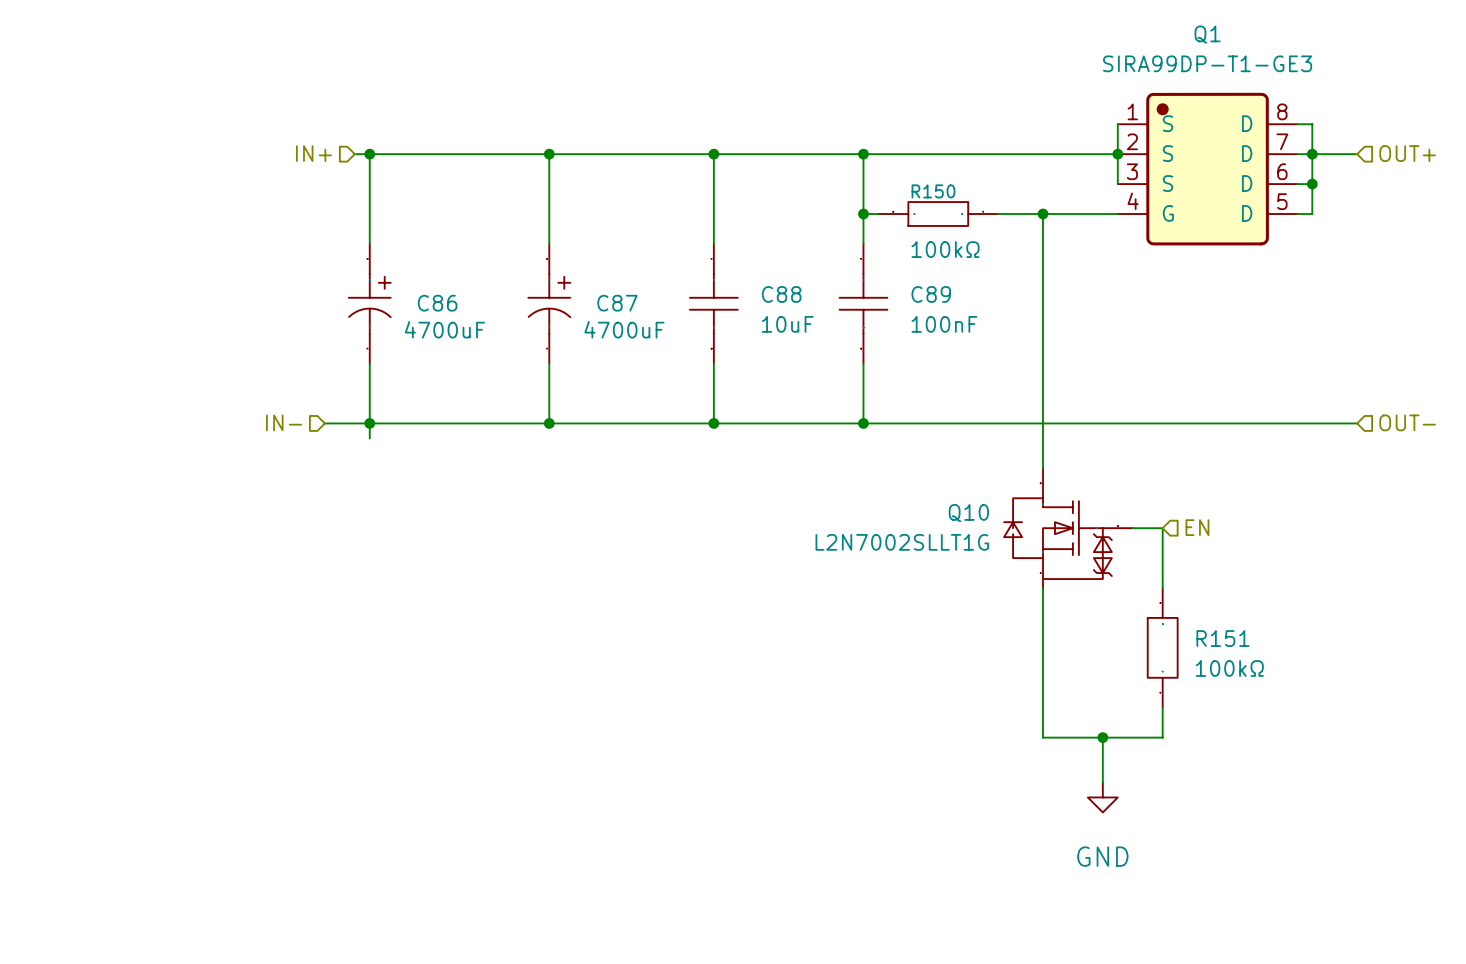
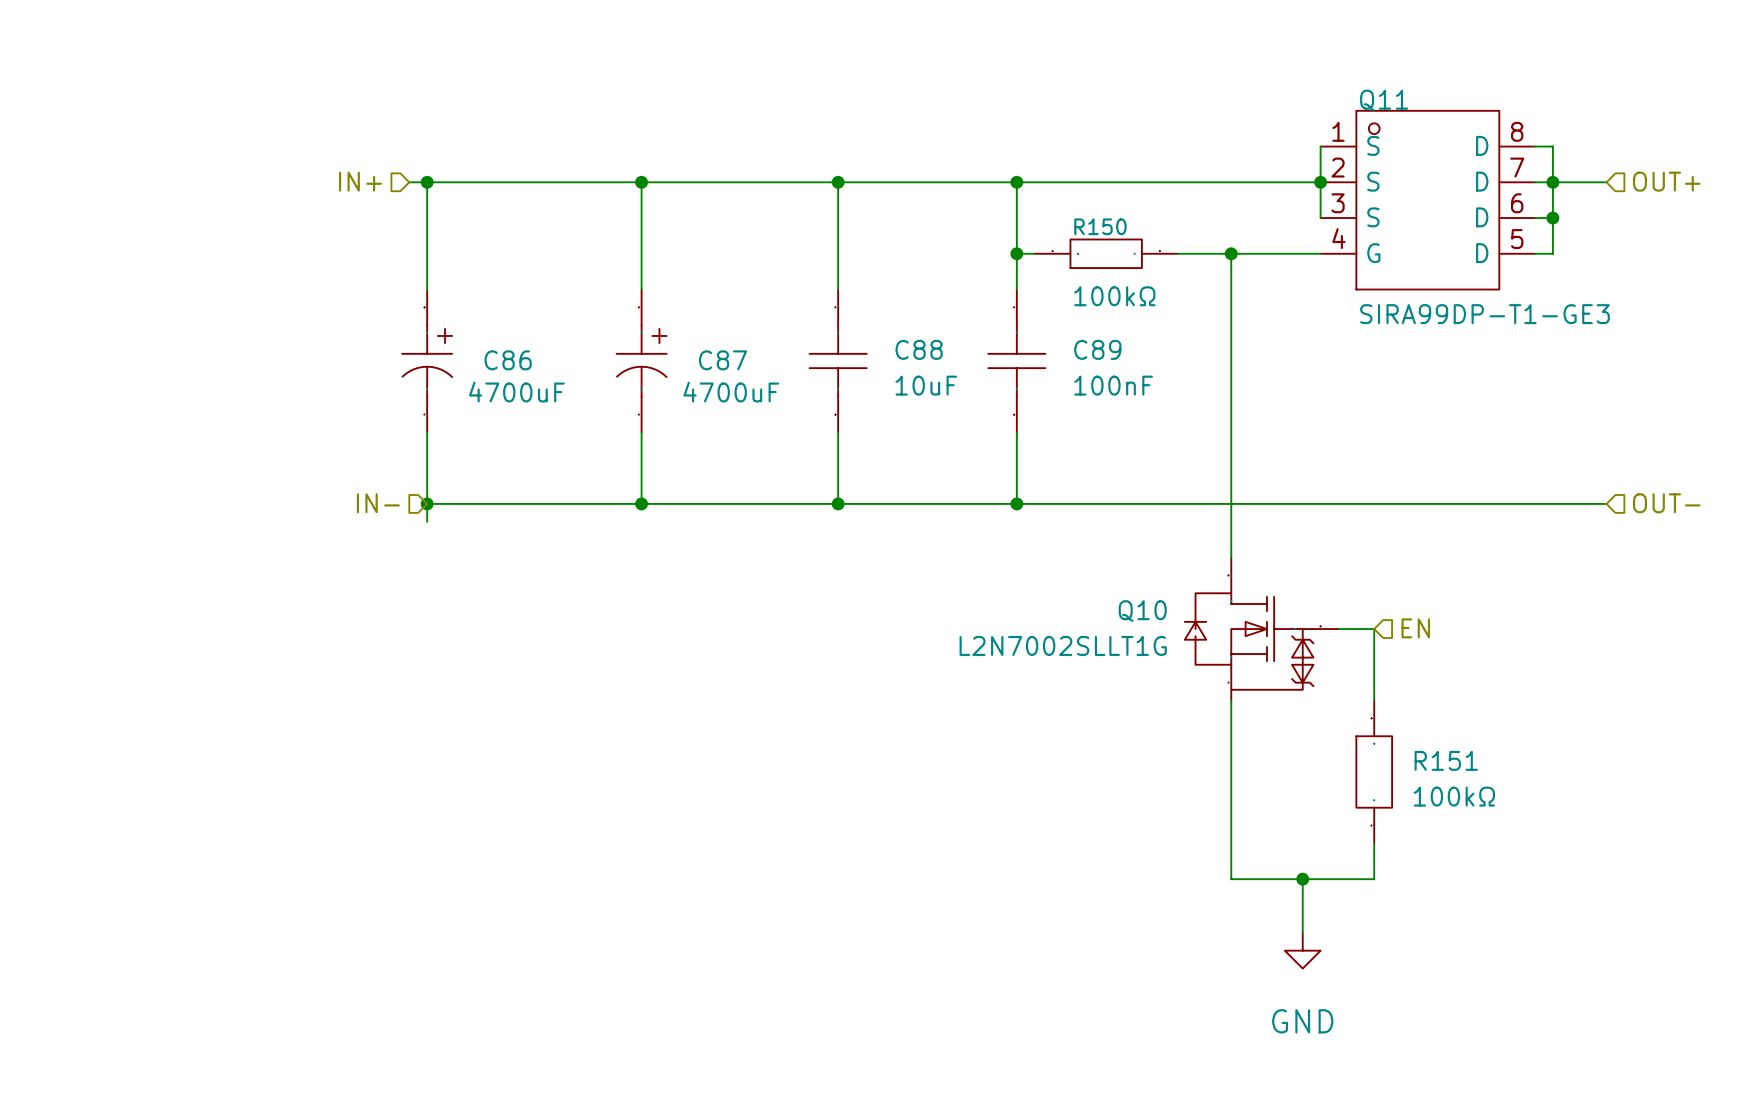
Q1: SIRA99DP-T1-GE3 (1207, 169) -> none
Q11: none -> SIRA99DP-T1-GE3 (1427, 200)
hierarchical label position: IN- (284, 422) -> IN- (378, 503)
wire: (324, 423) (369, 423) -> none

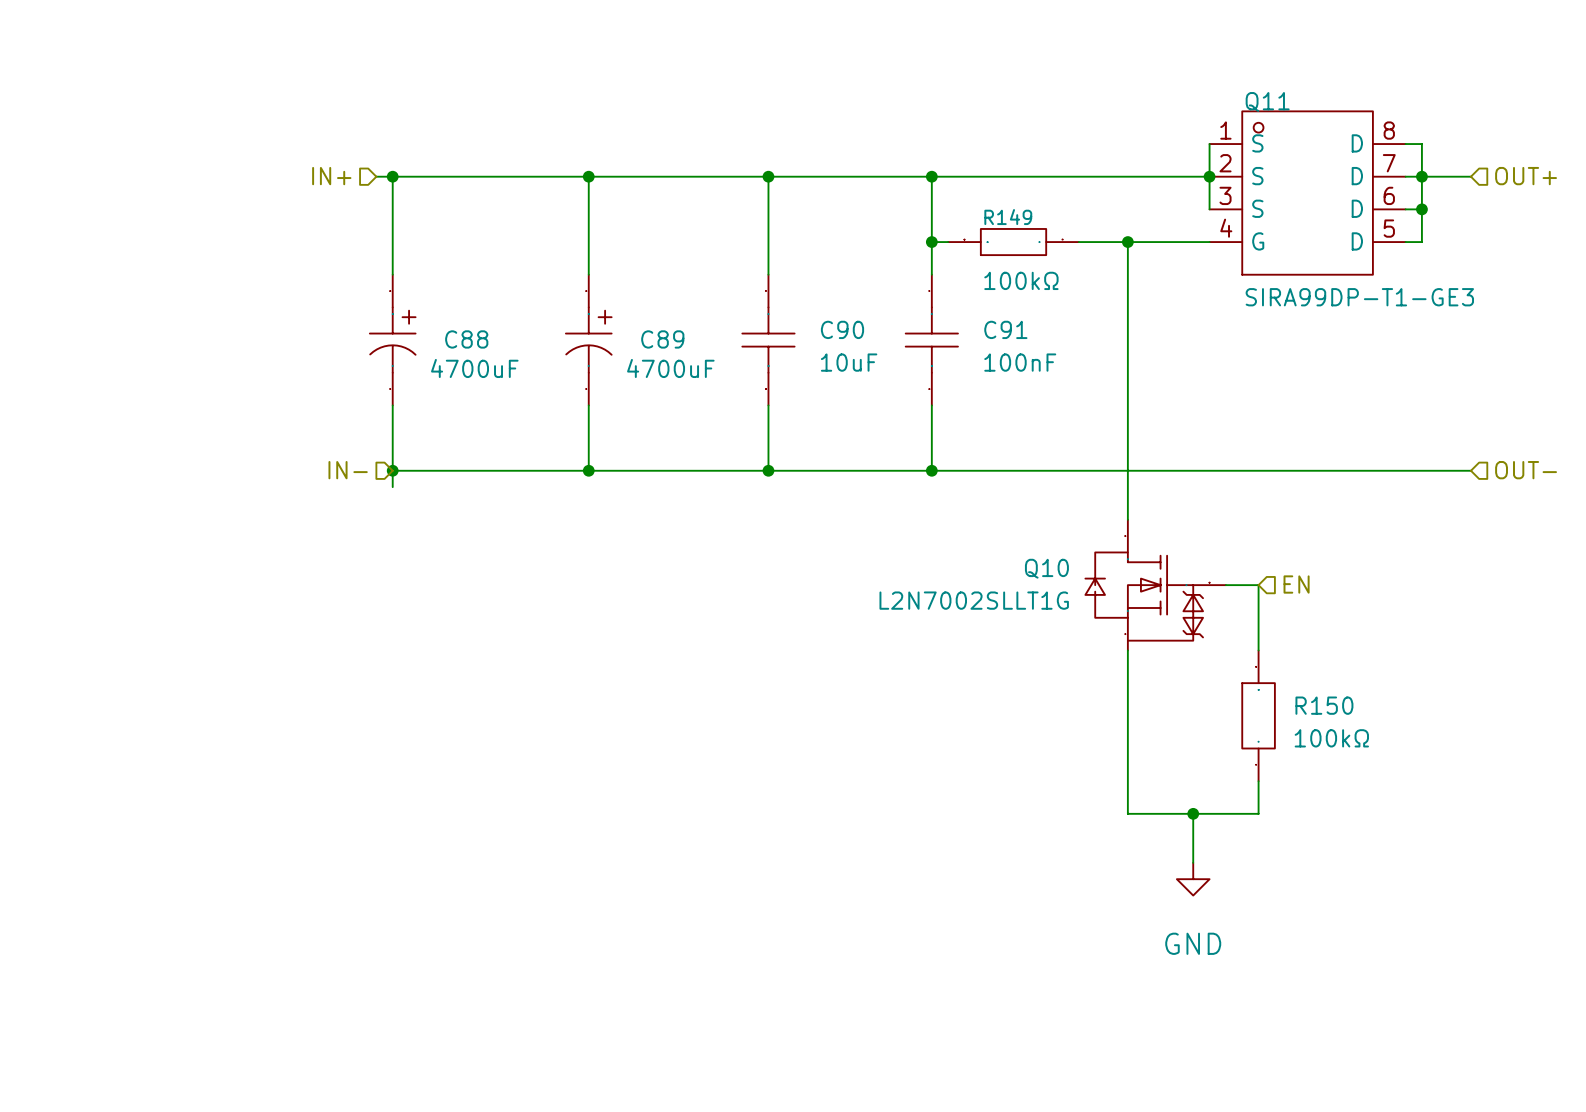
R150 name: R150 (1100, 226) -> R149 (1008, 217)
C88 name: C88 (919, 349) -> C90 (842, 329)
C89 name: C89 (1097, 349) -> C91 (1005, 329)
C86 name: C86 (508, 360) -> C88 (466, 339)
C87 name: C87 (722, 360) -> C89 (662, 339)
R151 name: R151 (1446, 760) -> R150 (1324, 705)

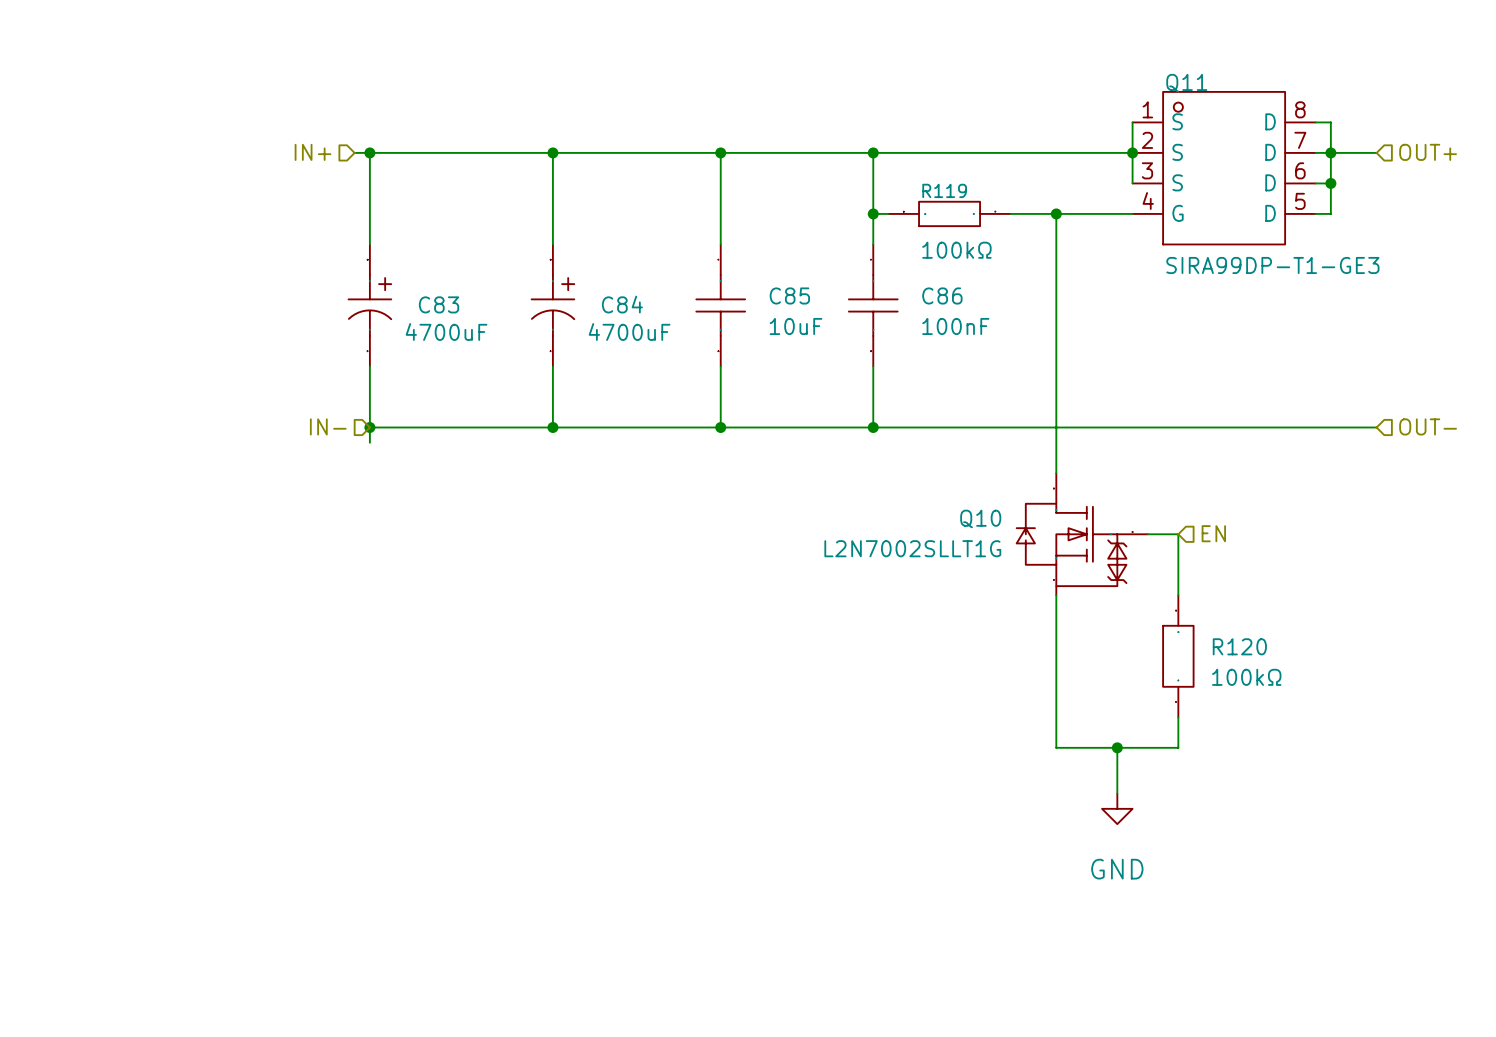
R149 name: R149 (1008, 217) -> R119 (944, 190)
C90 name: C90 (842, 329) -> C85 (789, 295)
C91 name: C91 (1005, 329) -> C86 (942, 295)
C88 name: C88 (466, 339) -> C83 (439, 304)
C89 name: C89 (662, 339) -> C84 (622, 304)
R150 name: R150 (1324, 705) -> R120 (1239, 646)

